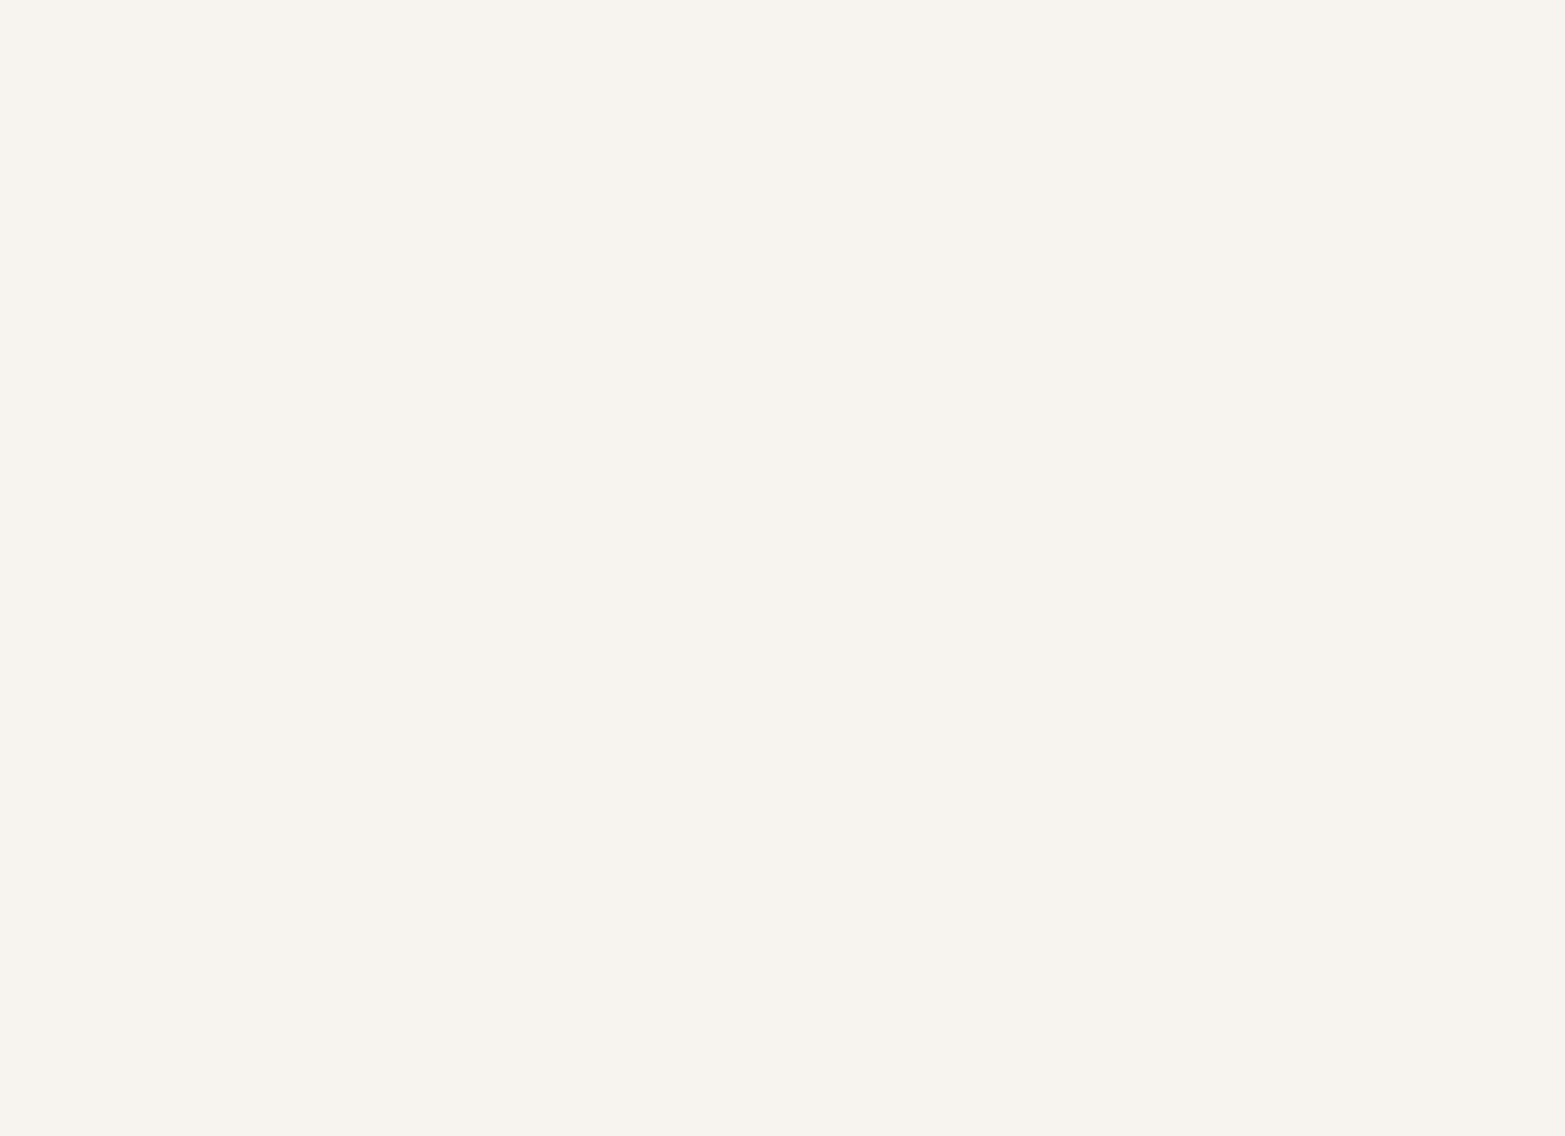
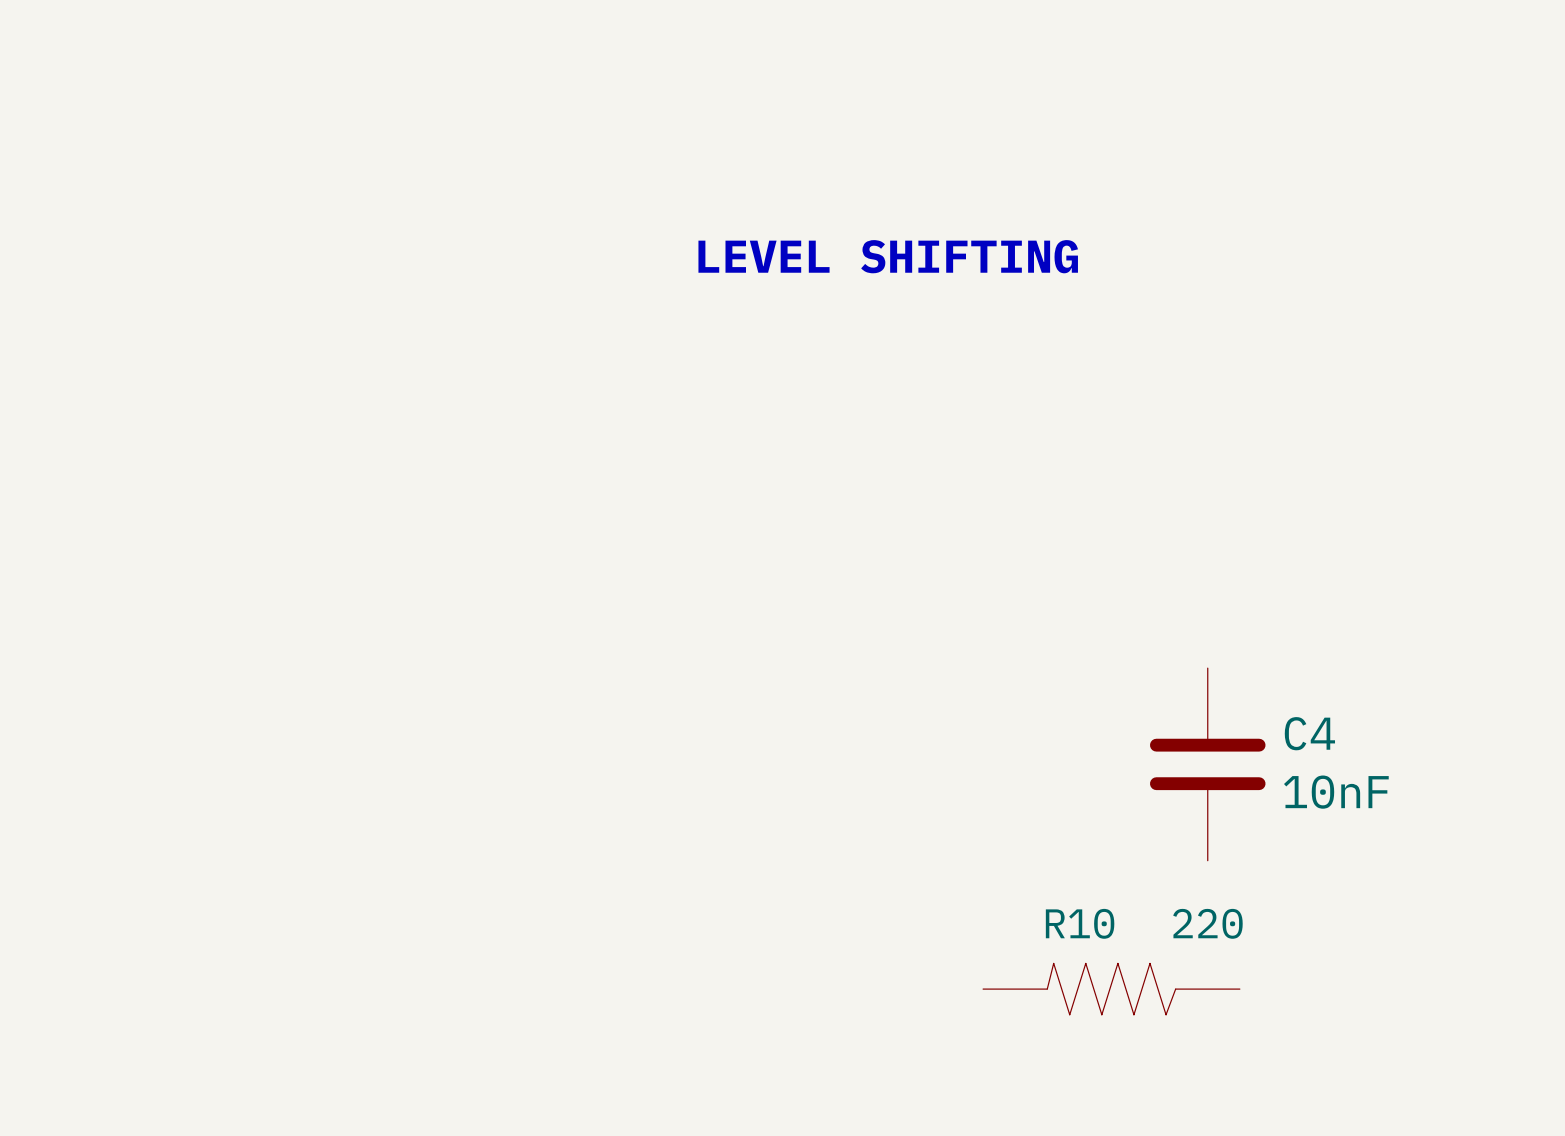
text: none -> LEVEL SHIFTING (888, 256)
C4: none -> 10nF (1207, 764)
R10: none -> 220 (1111, 989)

